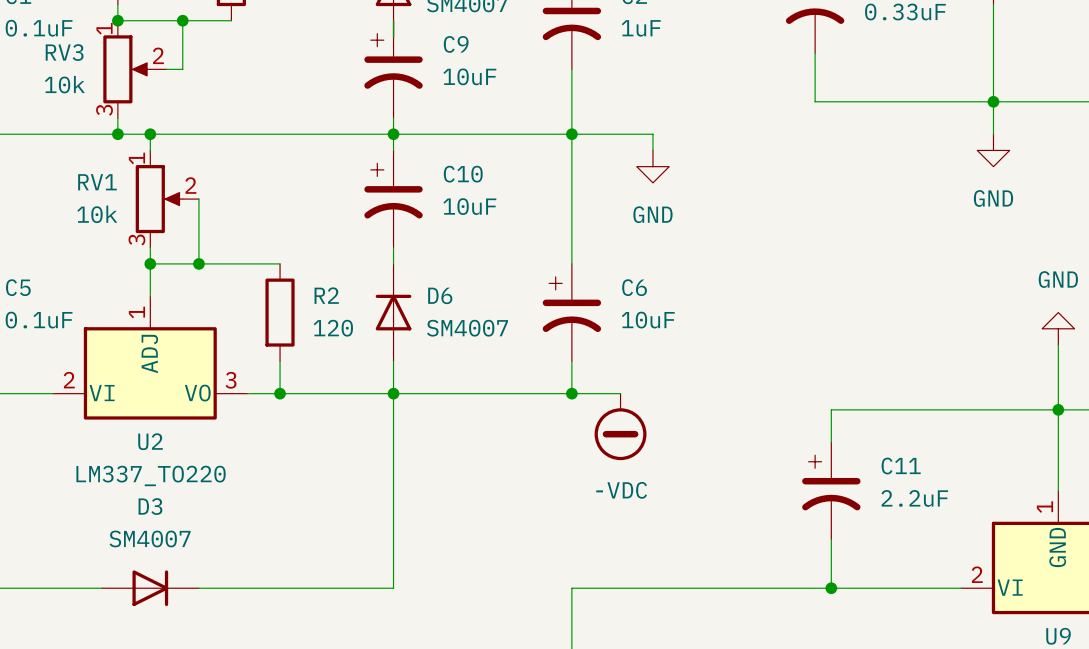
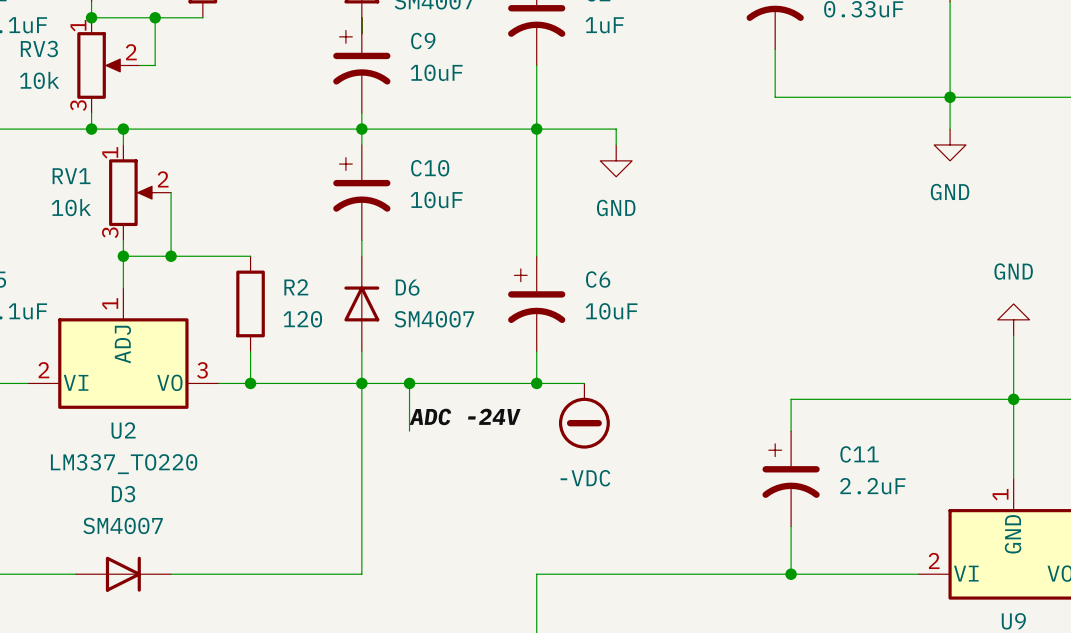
wire: none -> (409, 383) (409, 431)
junction: none -> (409, 383)
label: none -> ADC -24V (465, 416)

